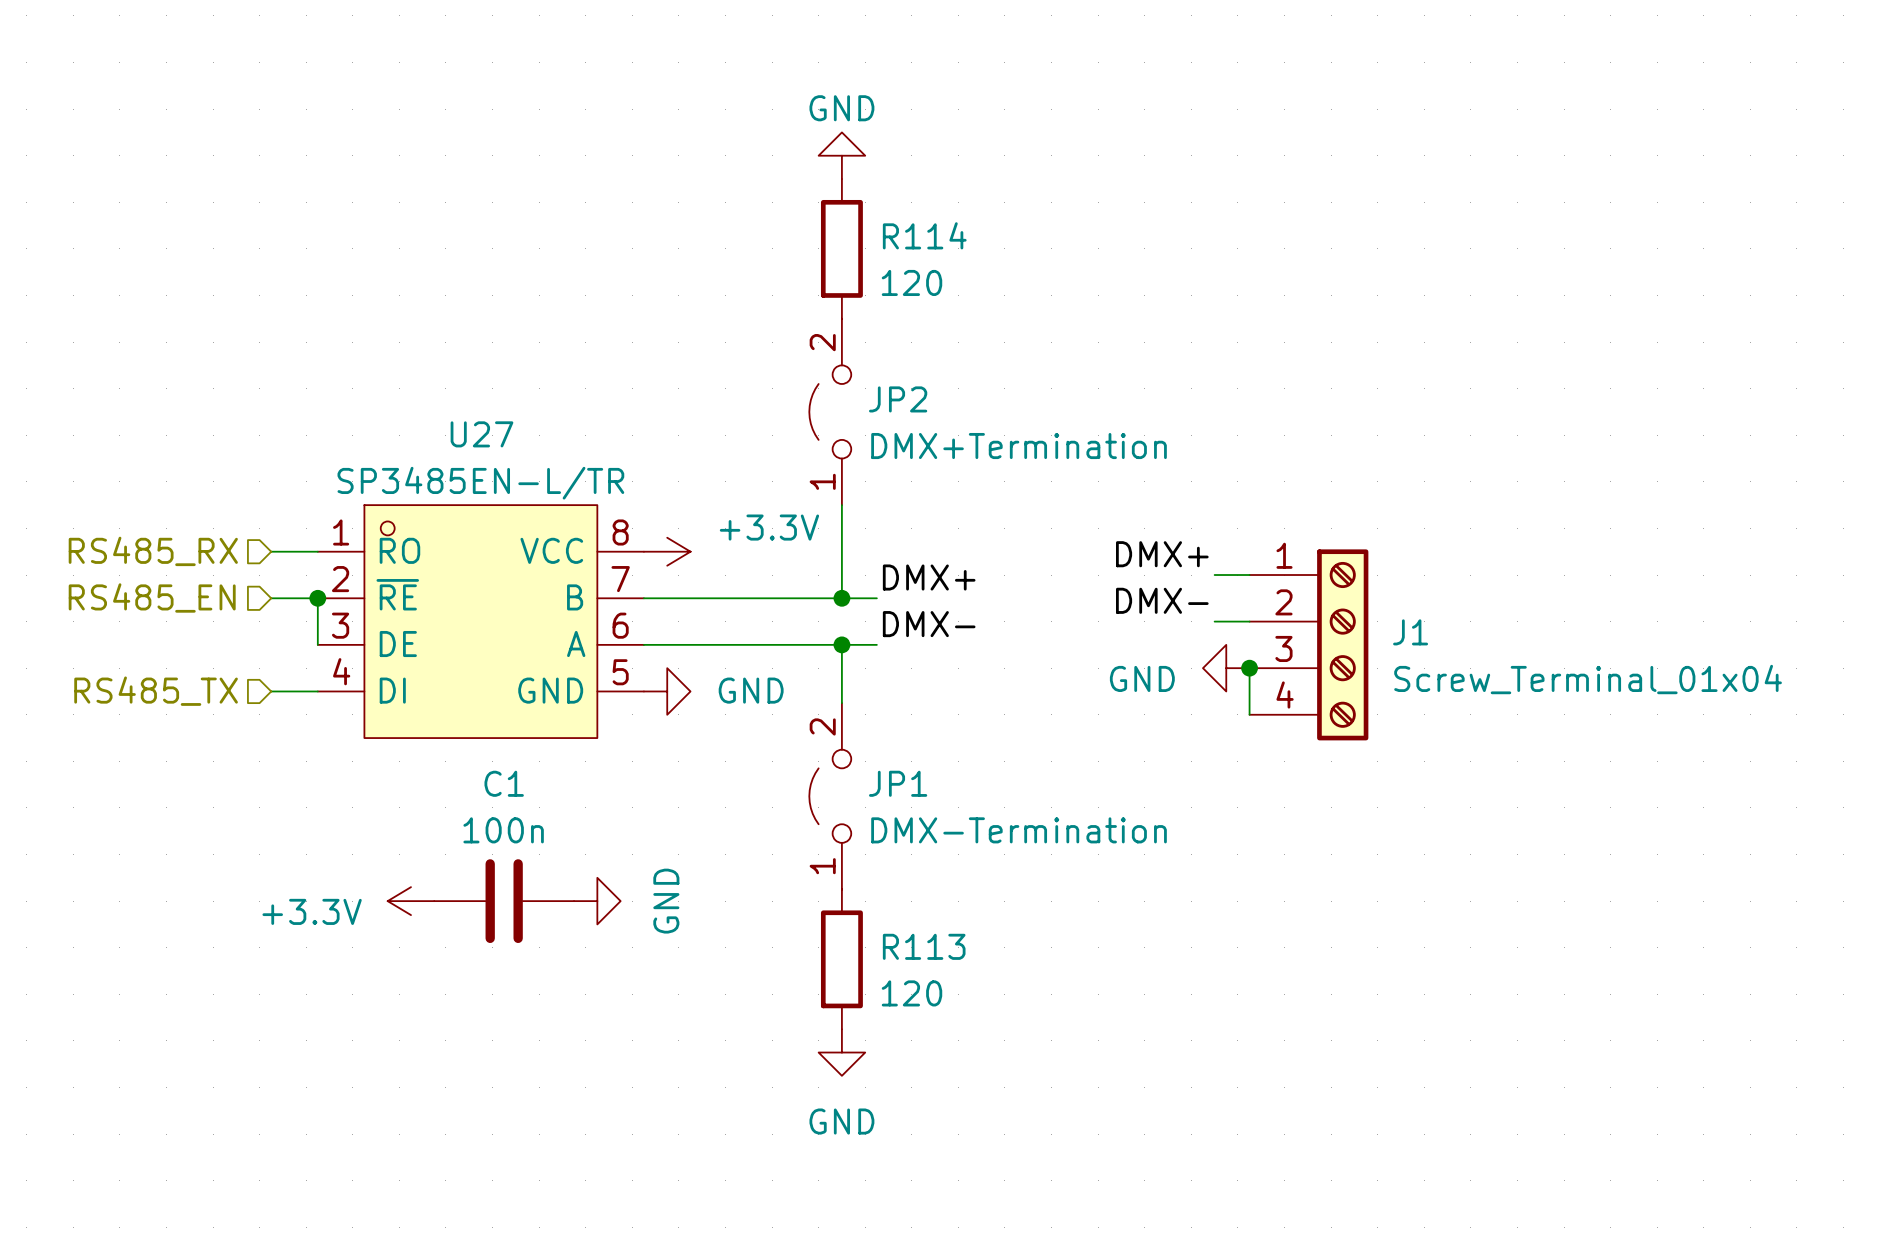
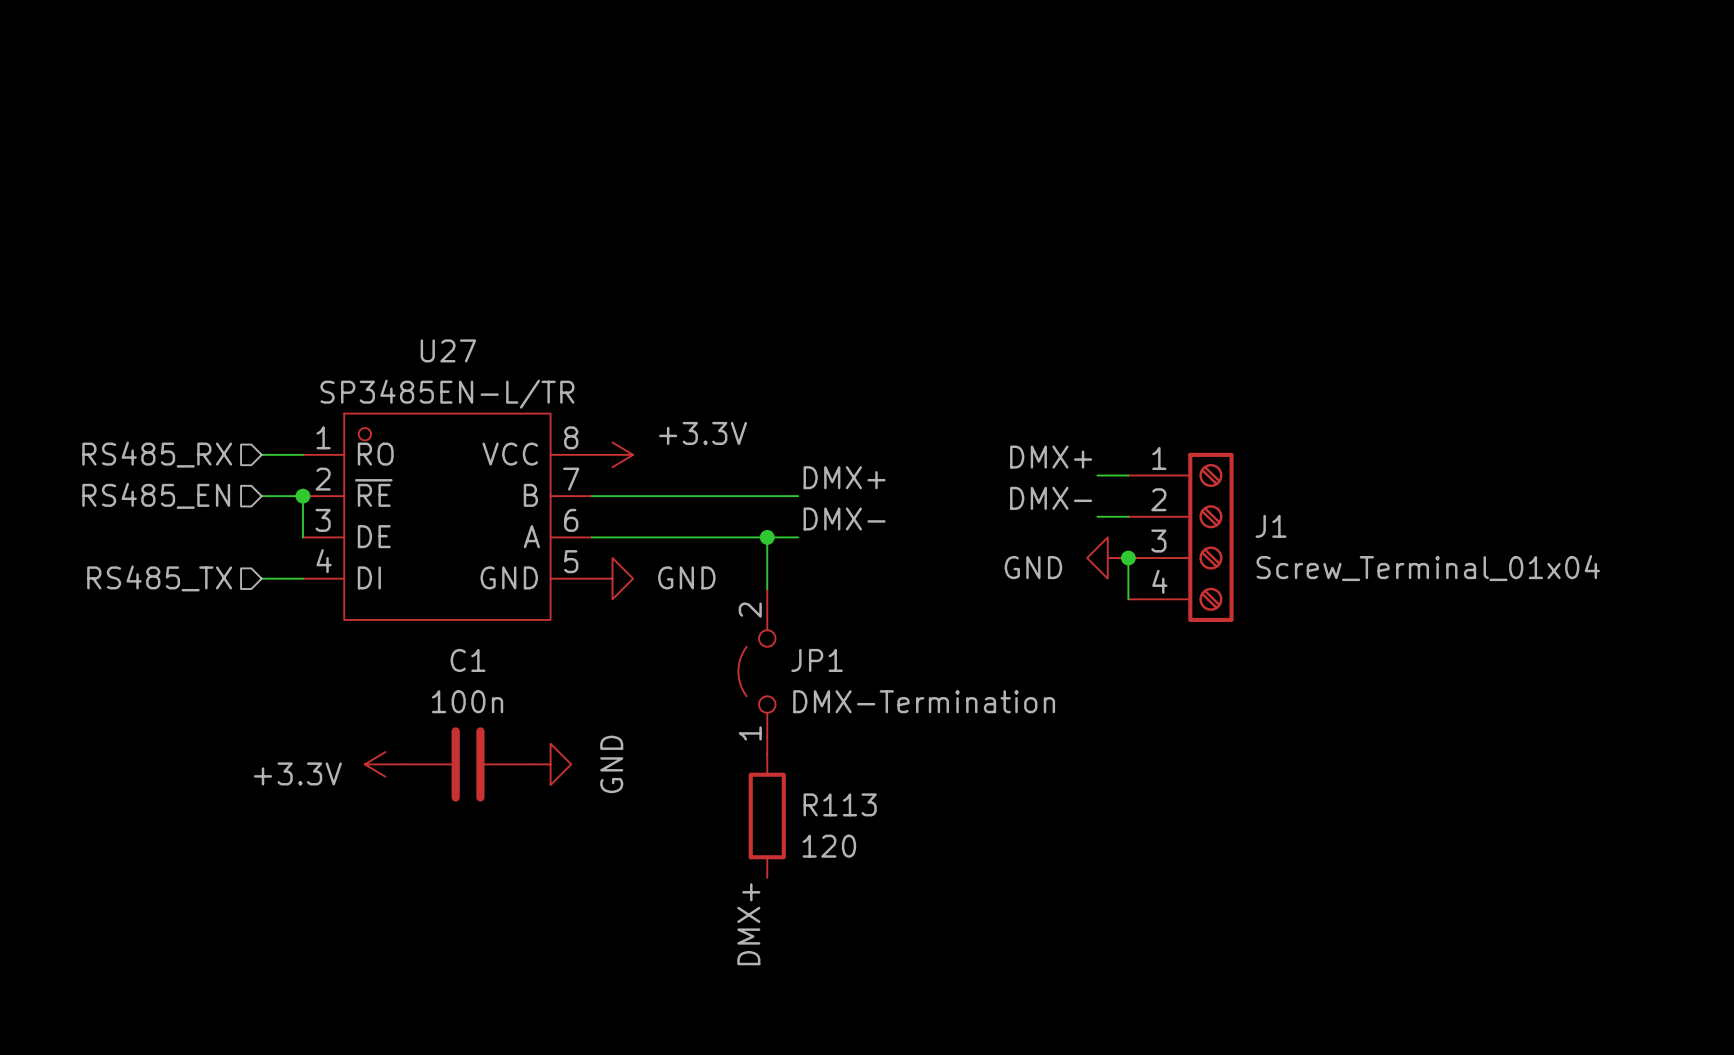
power symbol: GND (841, 155) -> none
R114: 120 (841, 248) -> none
JP2: DMX+Termination (830, 411) -> none
wire: (841, 505) (841, 598) -> none
junction: (841, 598) -> none
power symbol: GND (841, 1052) -> none
label: none -> DMX+ (748, 924)

